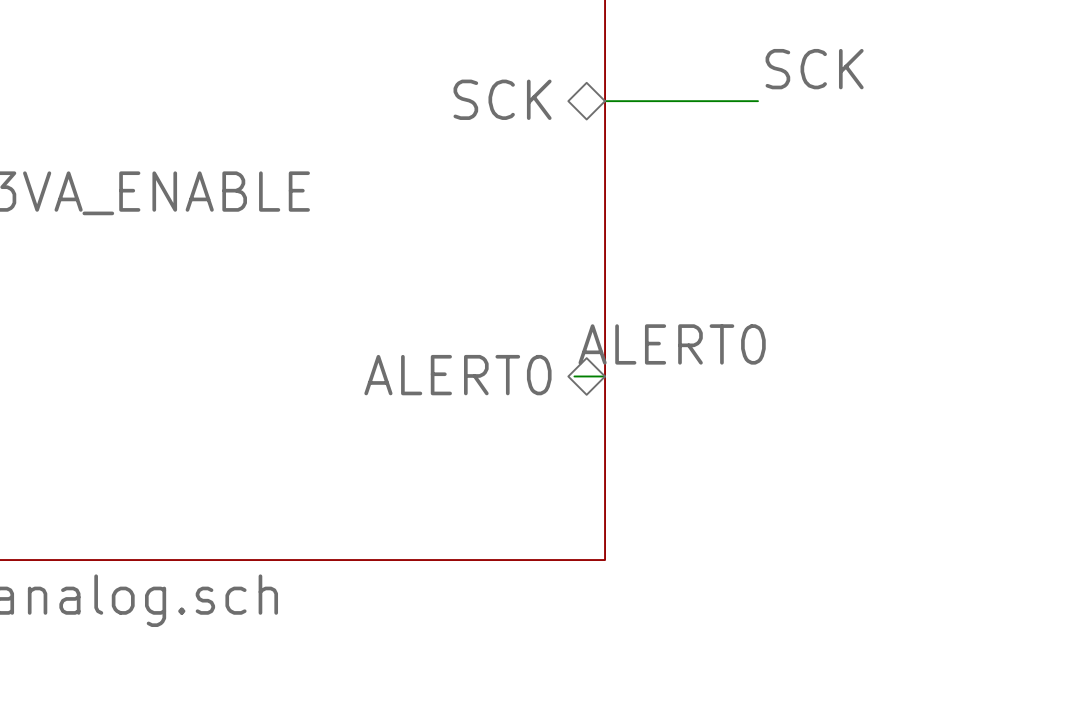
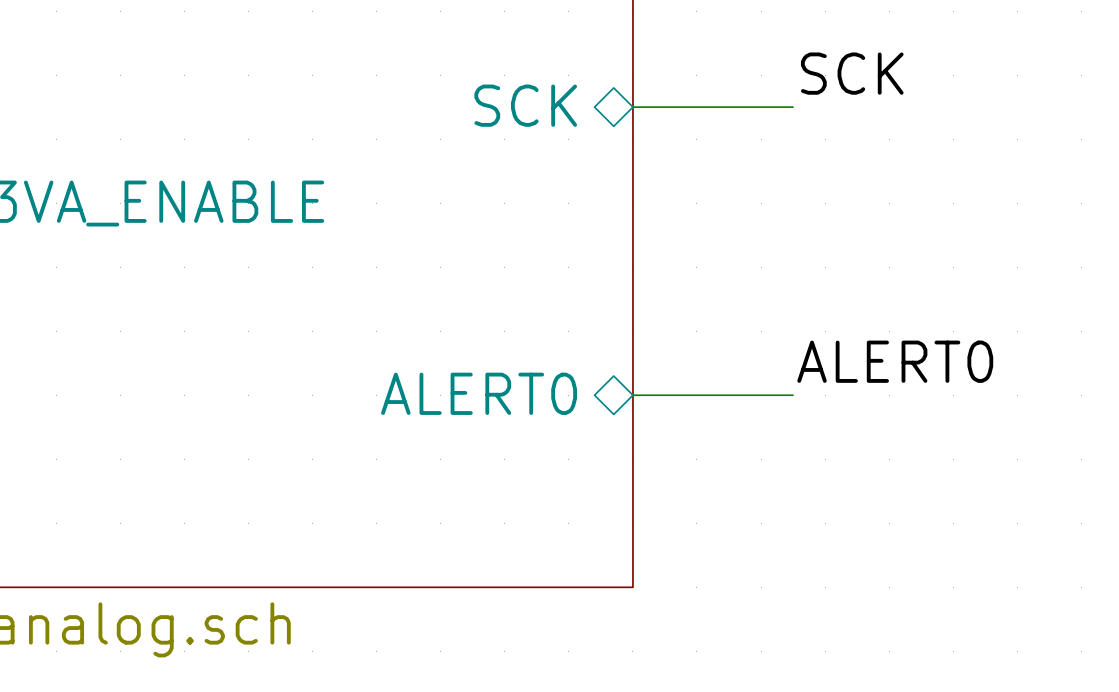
label position: ALERT0 (672, 344) -> ALERT0 (895, 361)
wire: (574, 376) (605, 376) -> (793, 395) (632, 395)

